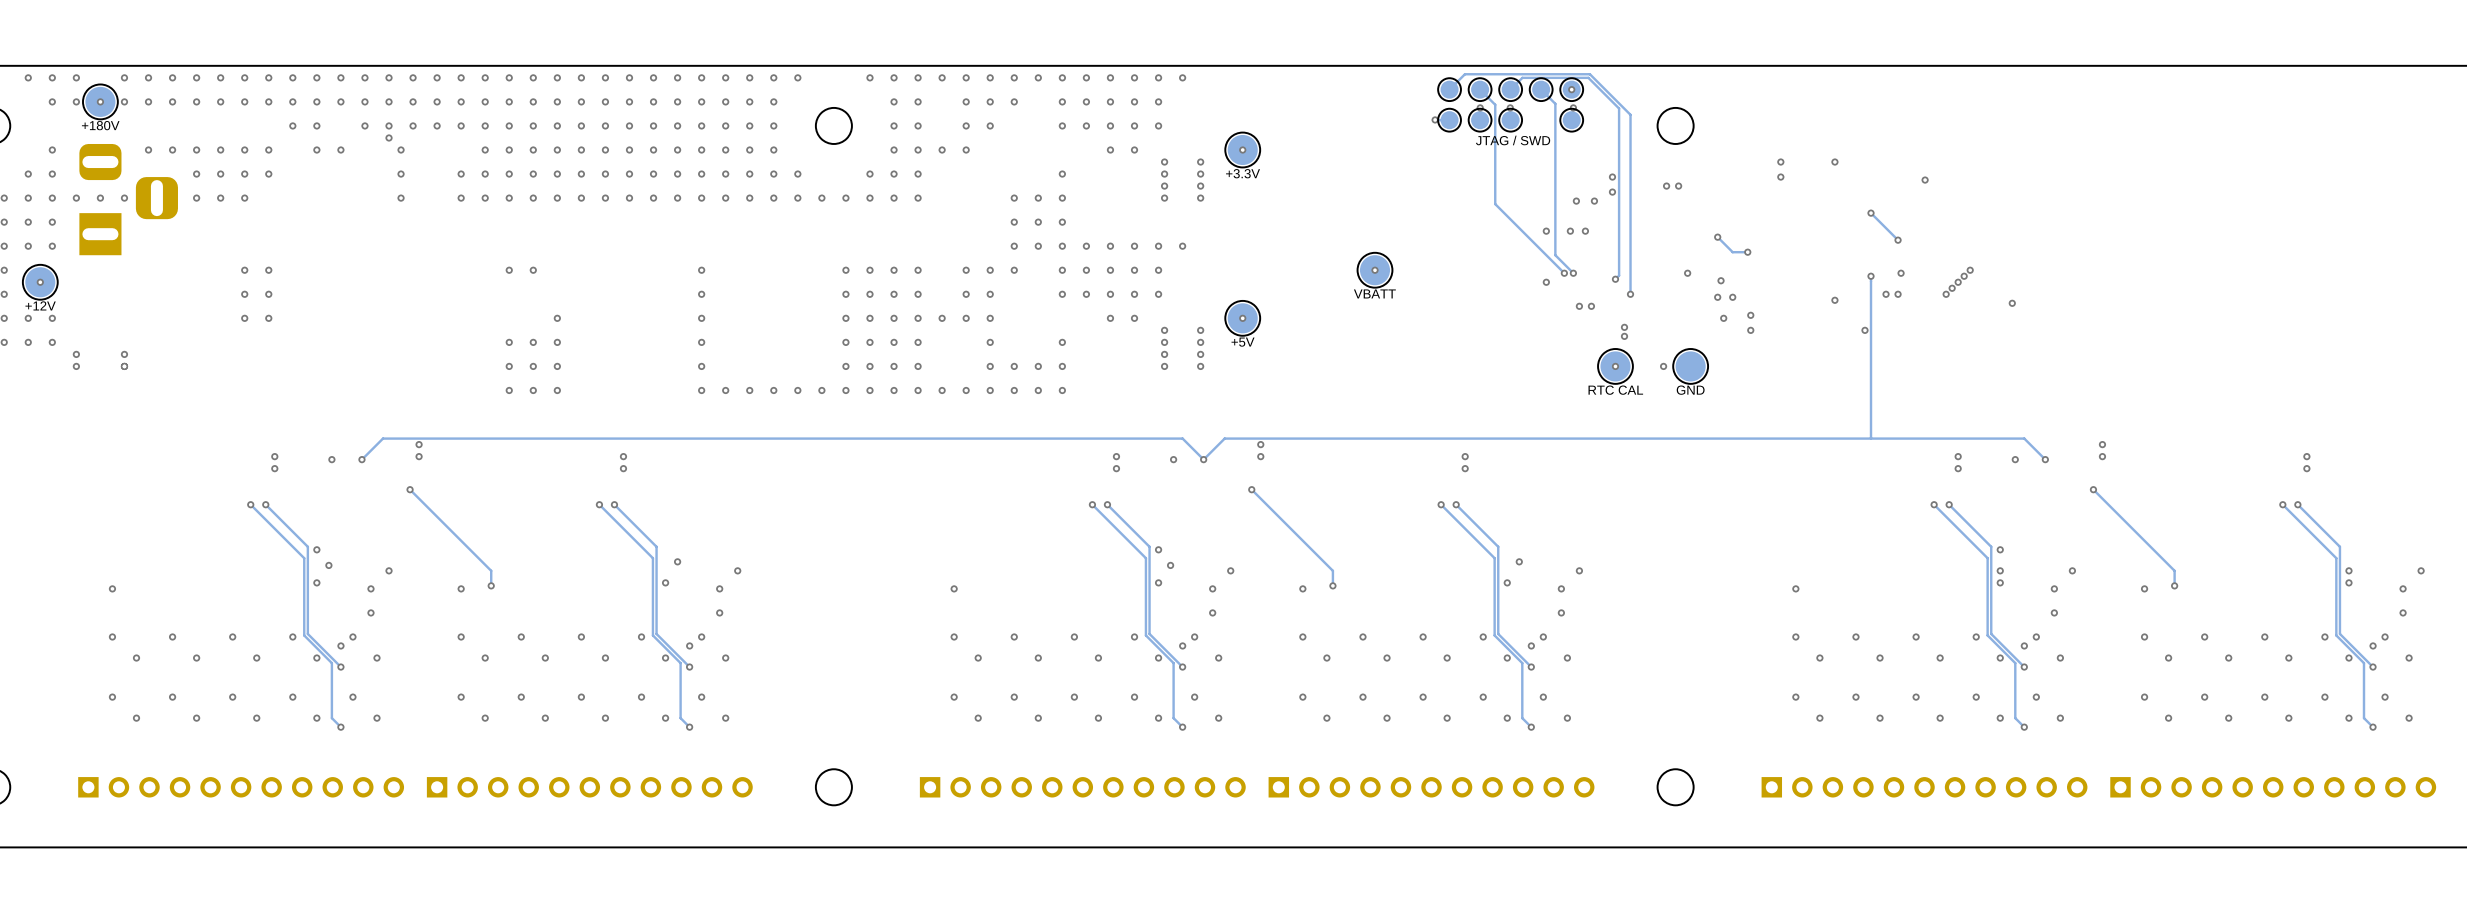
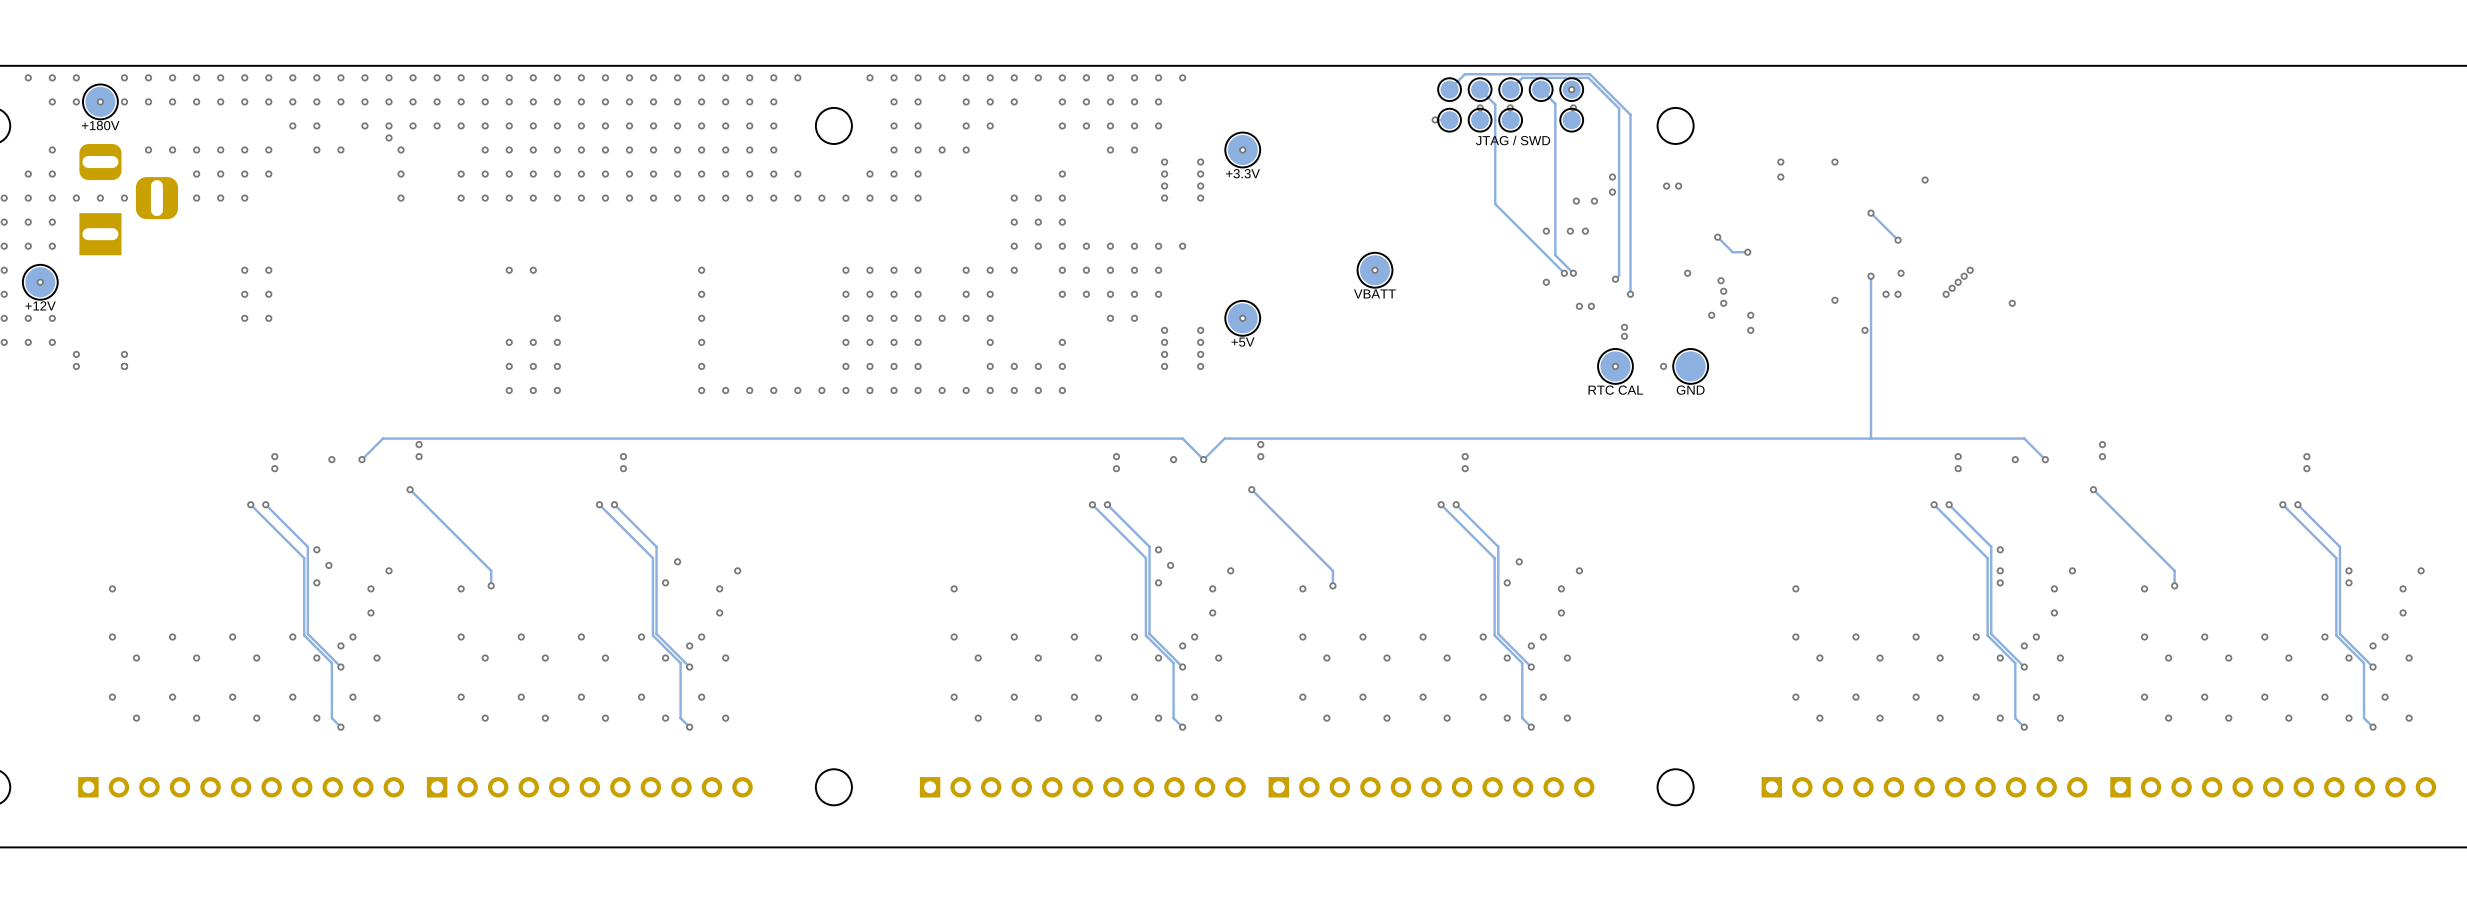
via: none -> (1723, 291)
via: (1717, 297) -> none
via: (1732, 297) -> none
via: none -> (1723, 303)
via: none -> (1711, 315)
via: (1723, 318) -> none

